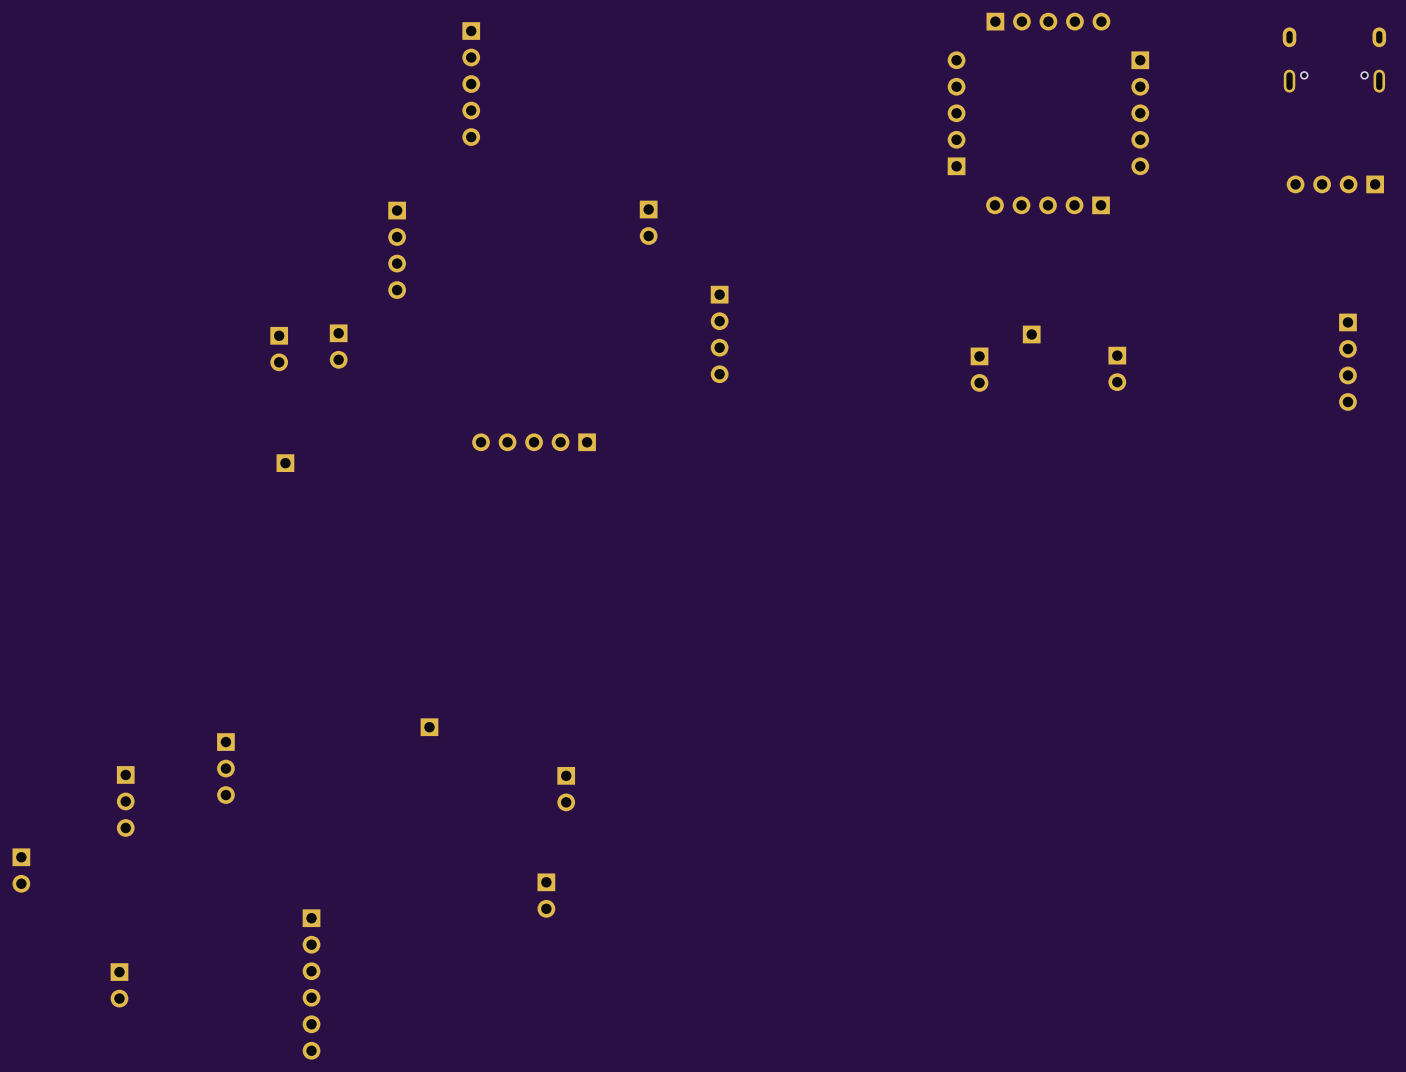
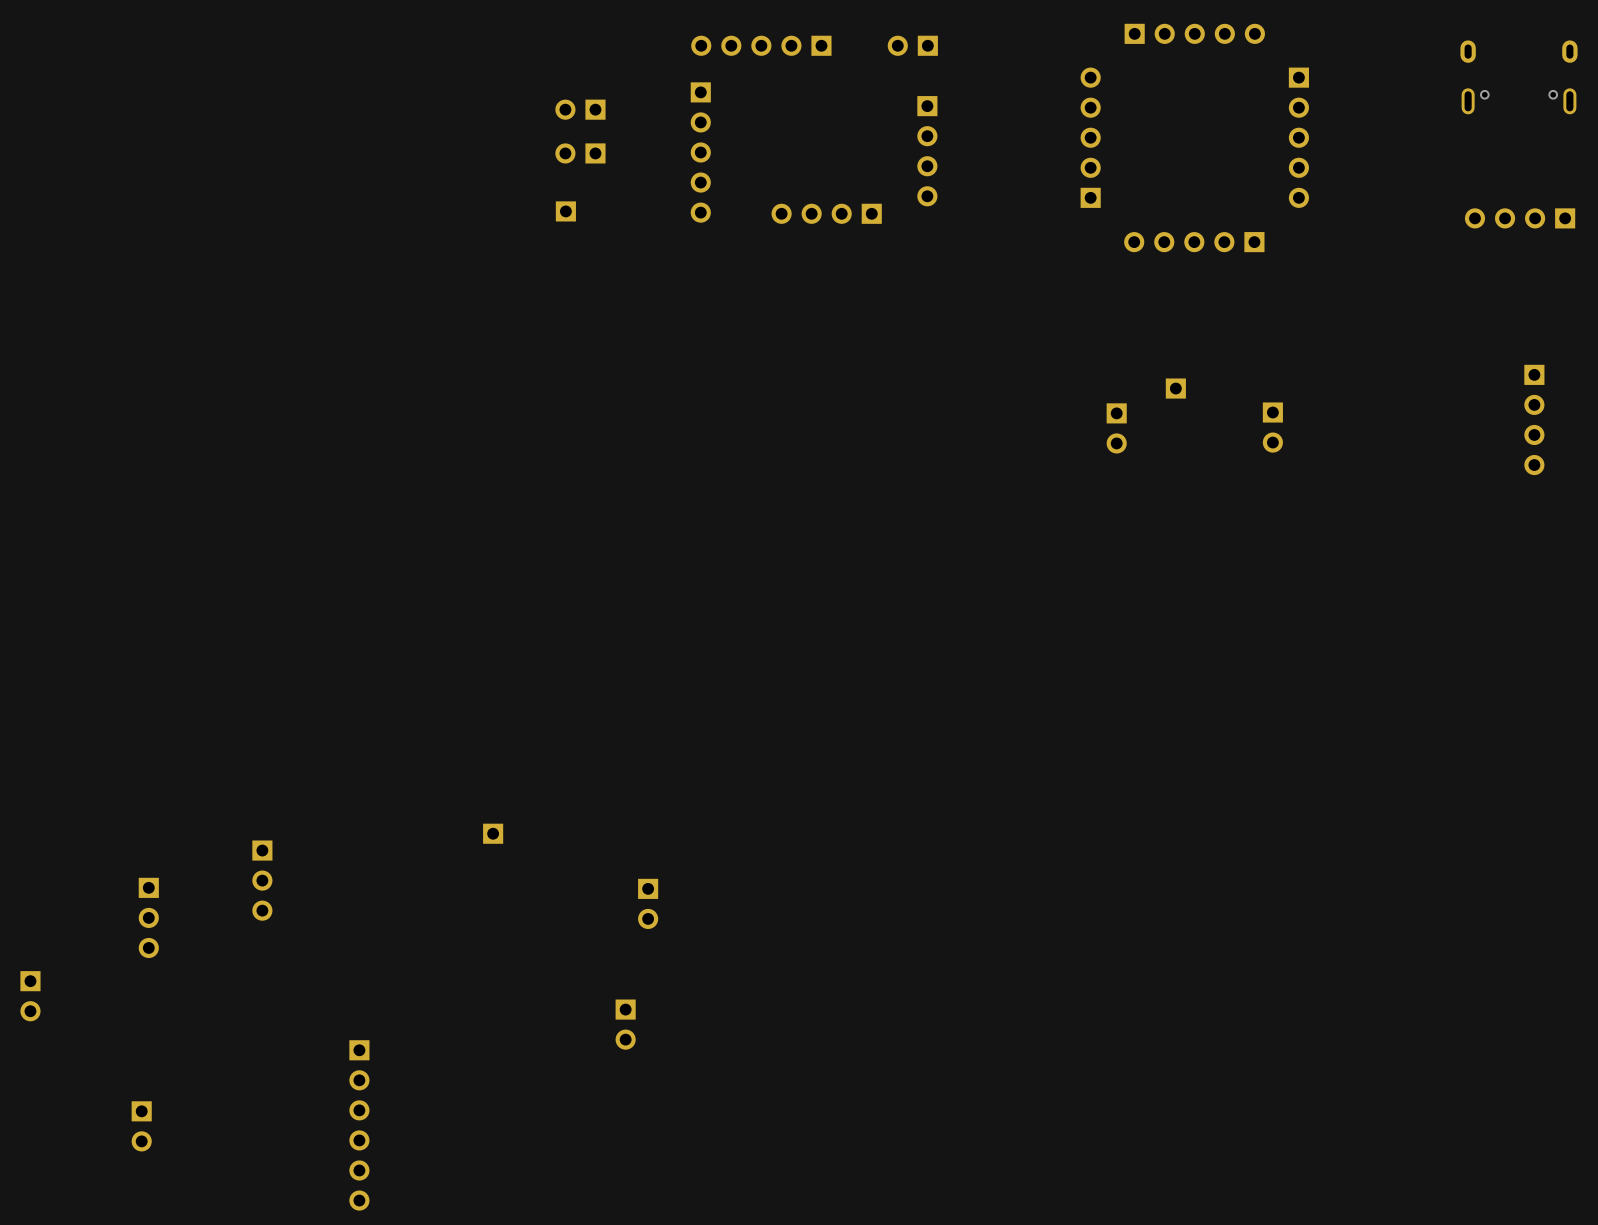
part: none -> (761, 45)
part: none -> (912, 45)
part: (471, 84) -> none
part: none -> (580, 109)
part: none -> (927, 151)
part: none -> (700, 152)
part: none -> (580, 153)
part: none -> (565, 211)
part: none -> (826, 213)
part: (648, 222) -> none
part: (397, 250) -> none
part: (719, 334) -> none
part: (338, 346) -> none
part: (279, 349) -> none
part: (534, 442) -> none
part: (285, 463) -> none

